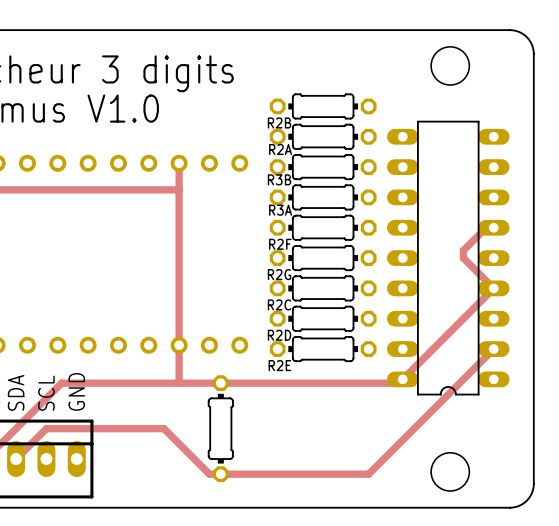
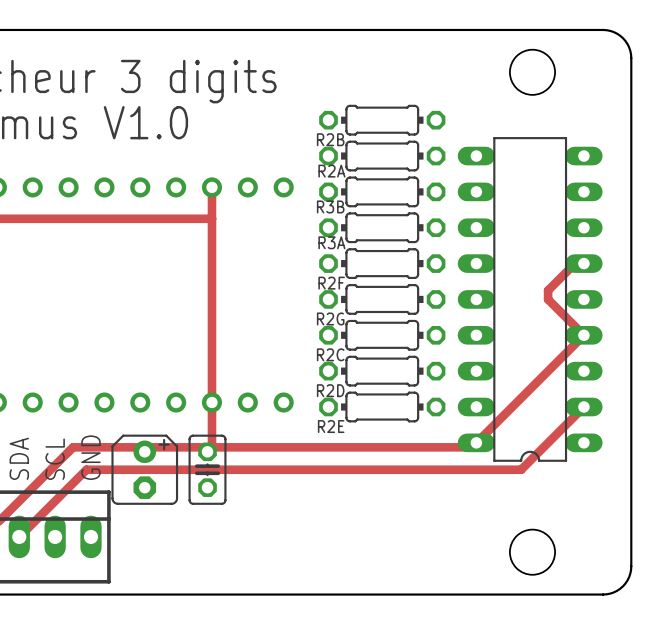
part: none -> (144, 469)
part: none -> (207, 469)
track: (440, 402) (368, 474) (209, 474) (163, 428) (46, 428) -> (521, 469) (86, 469) (55, 501)
part: (220, 428) -> none

